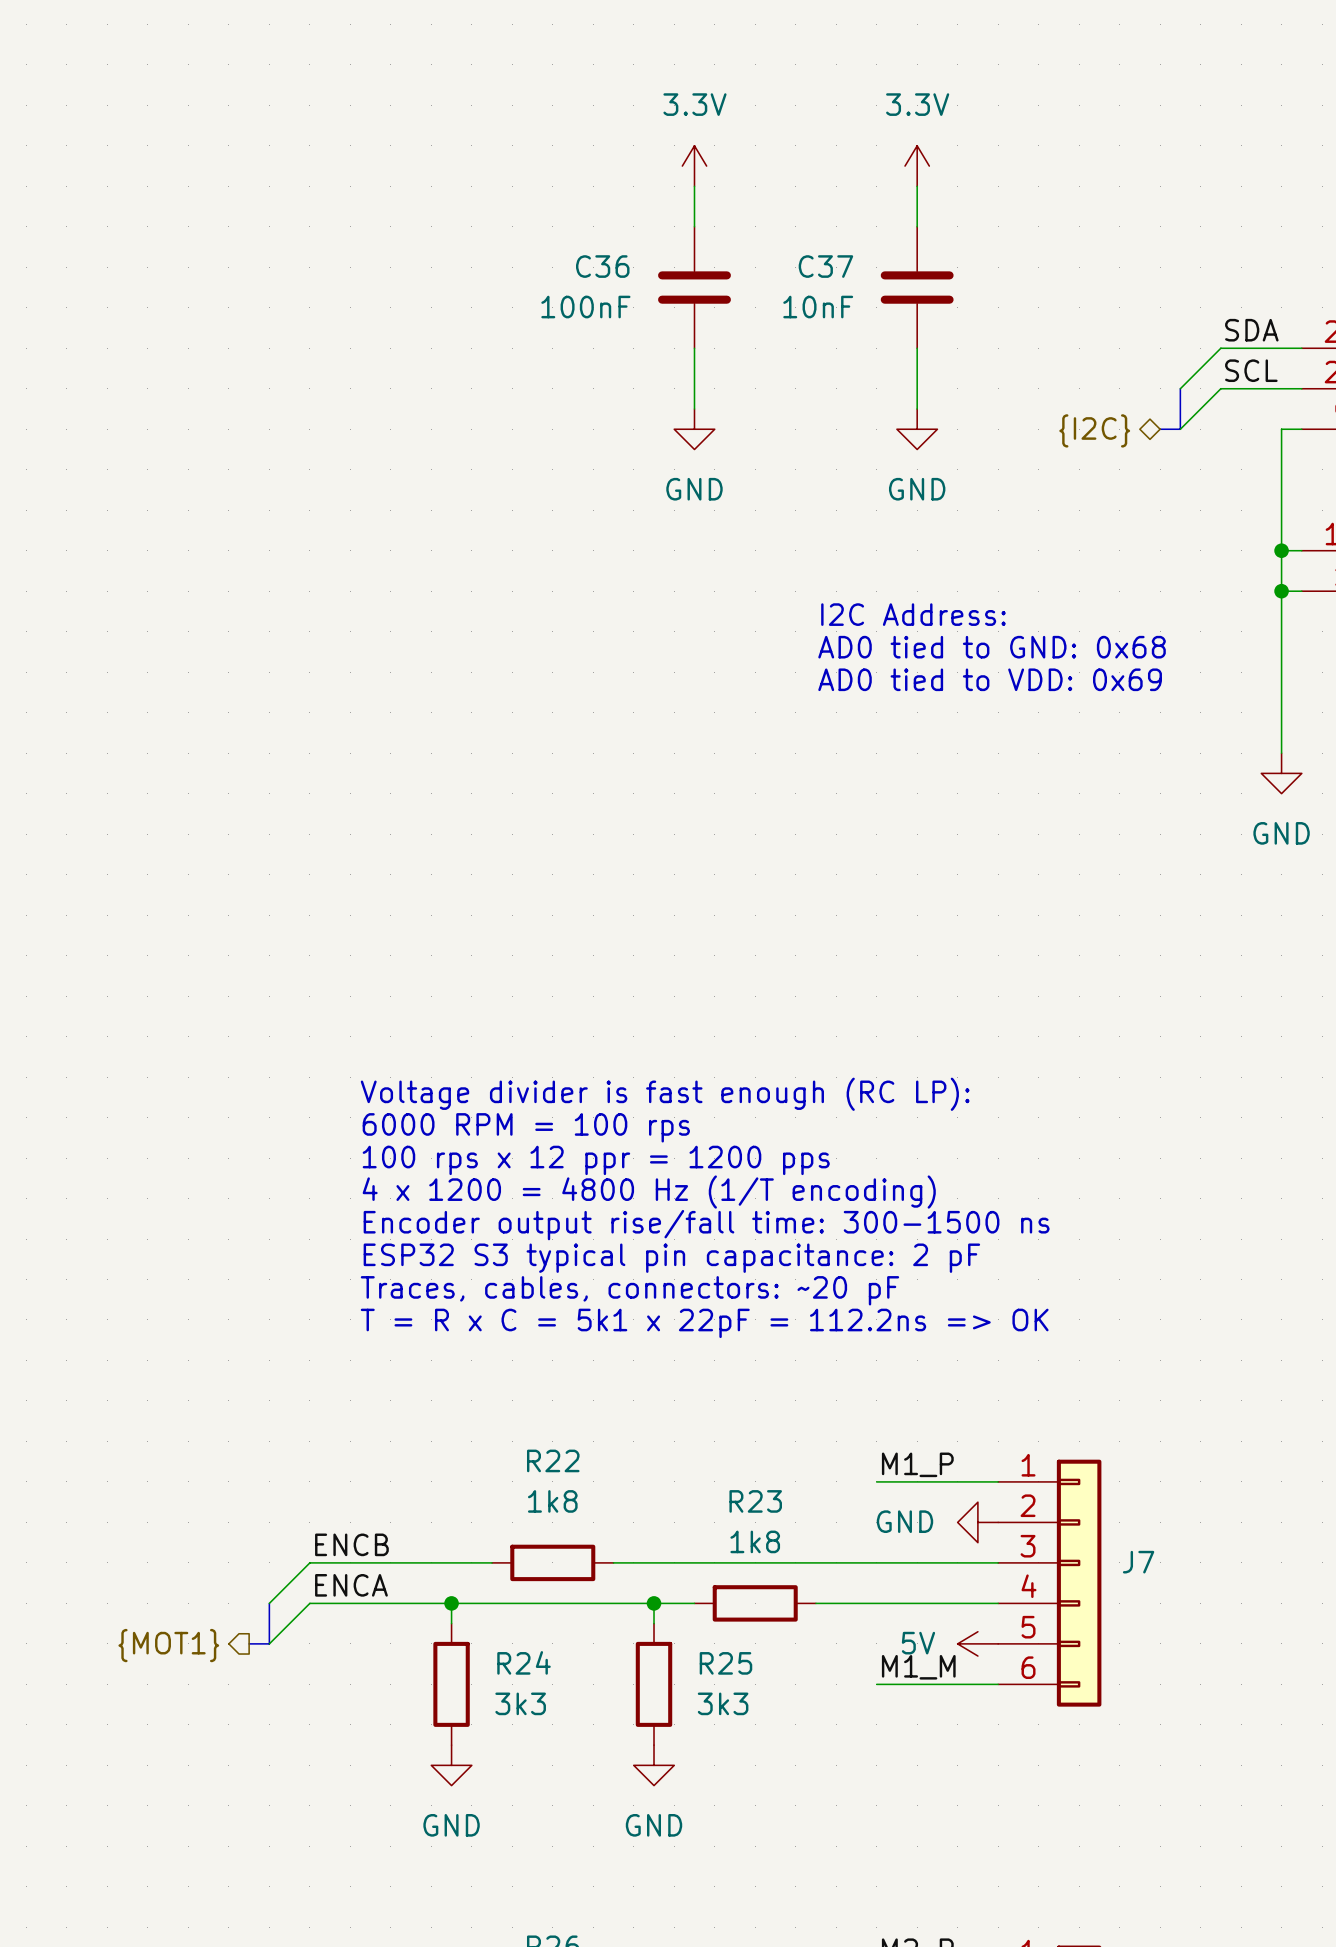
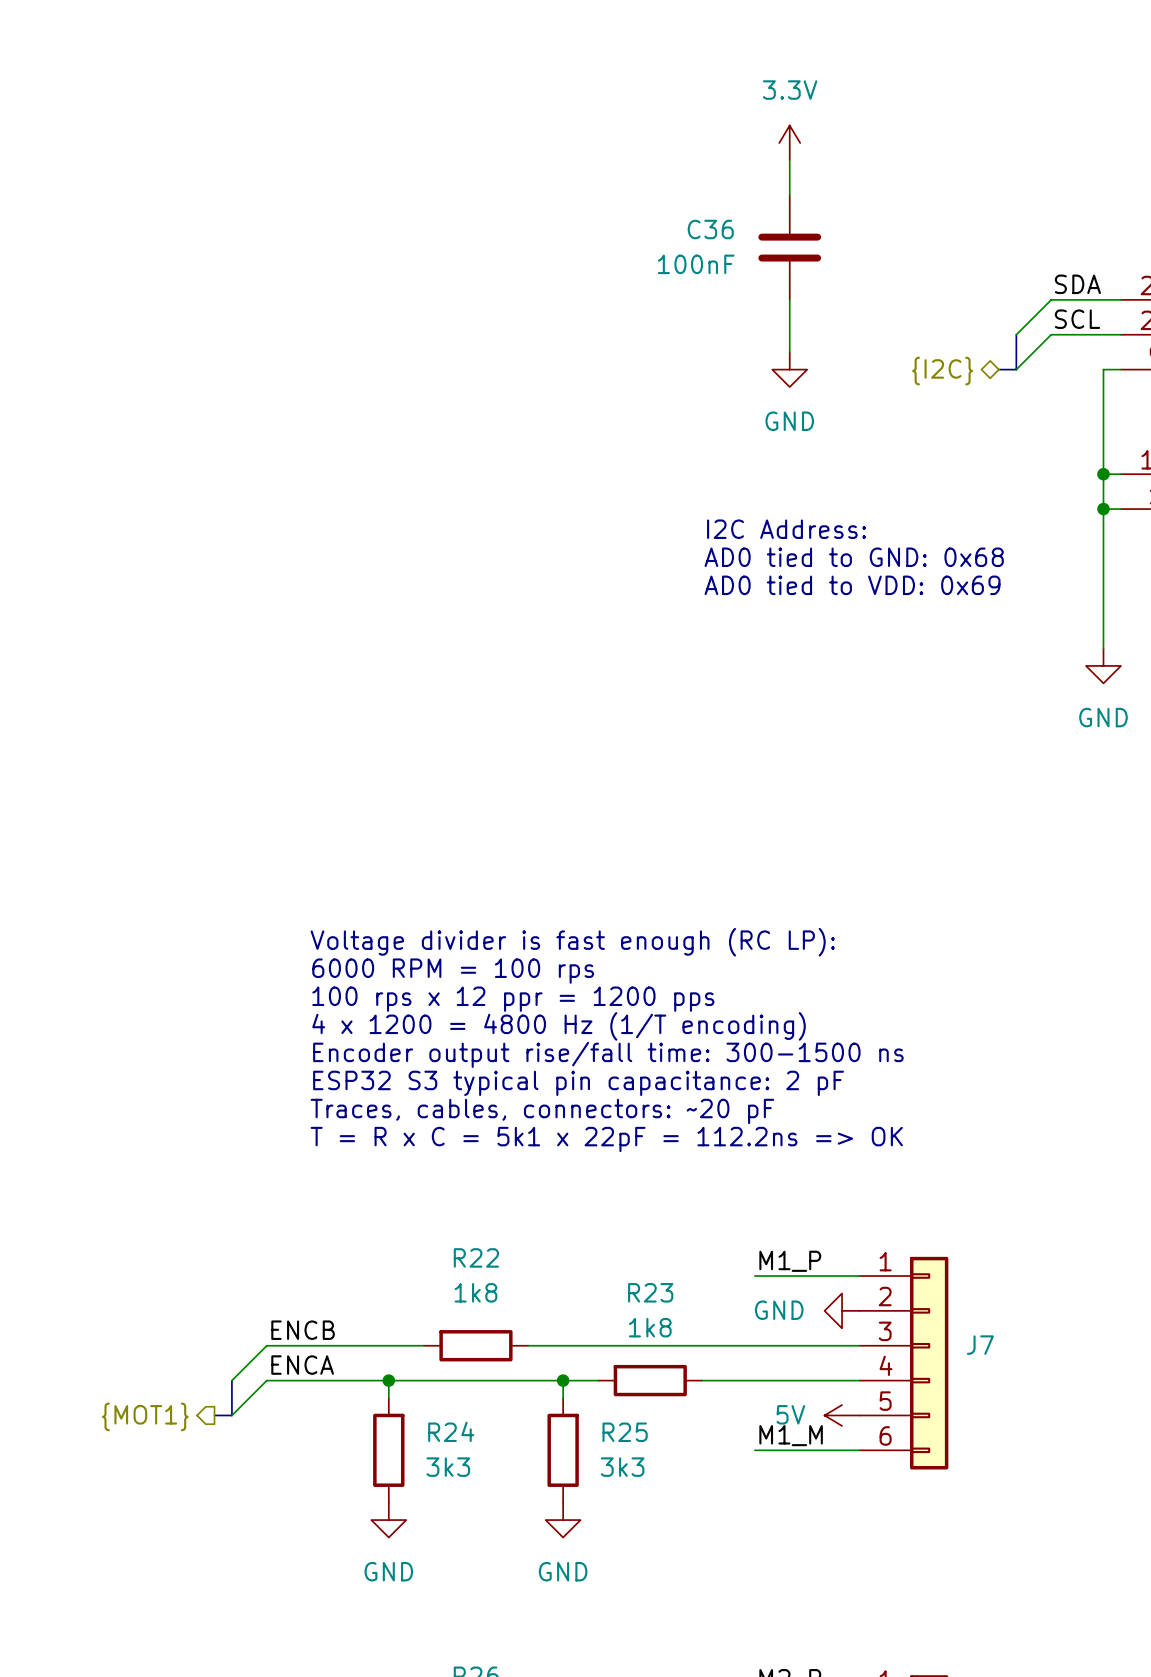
power symbol: 3.3V (694, 166) -> none
wire: (694, 186) (694, 226) -> none
C37 name: C37 (825, 266) -> C36 (710, 229)
C36: 100nF (694, 287) -> none
C37 value: 10nF (818, 307) -> 100nF (696, 264)
wire: (694, 348) (694, 409) -> none
power symbol: GND (694, 429) -> none

